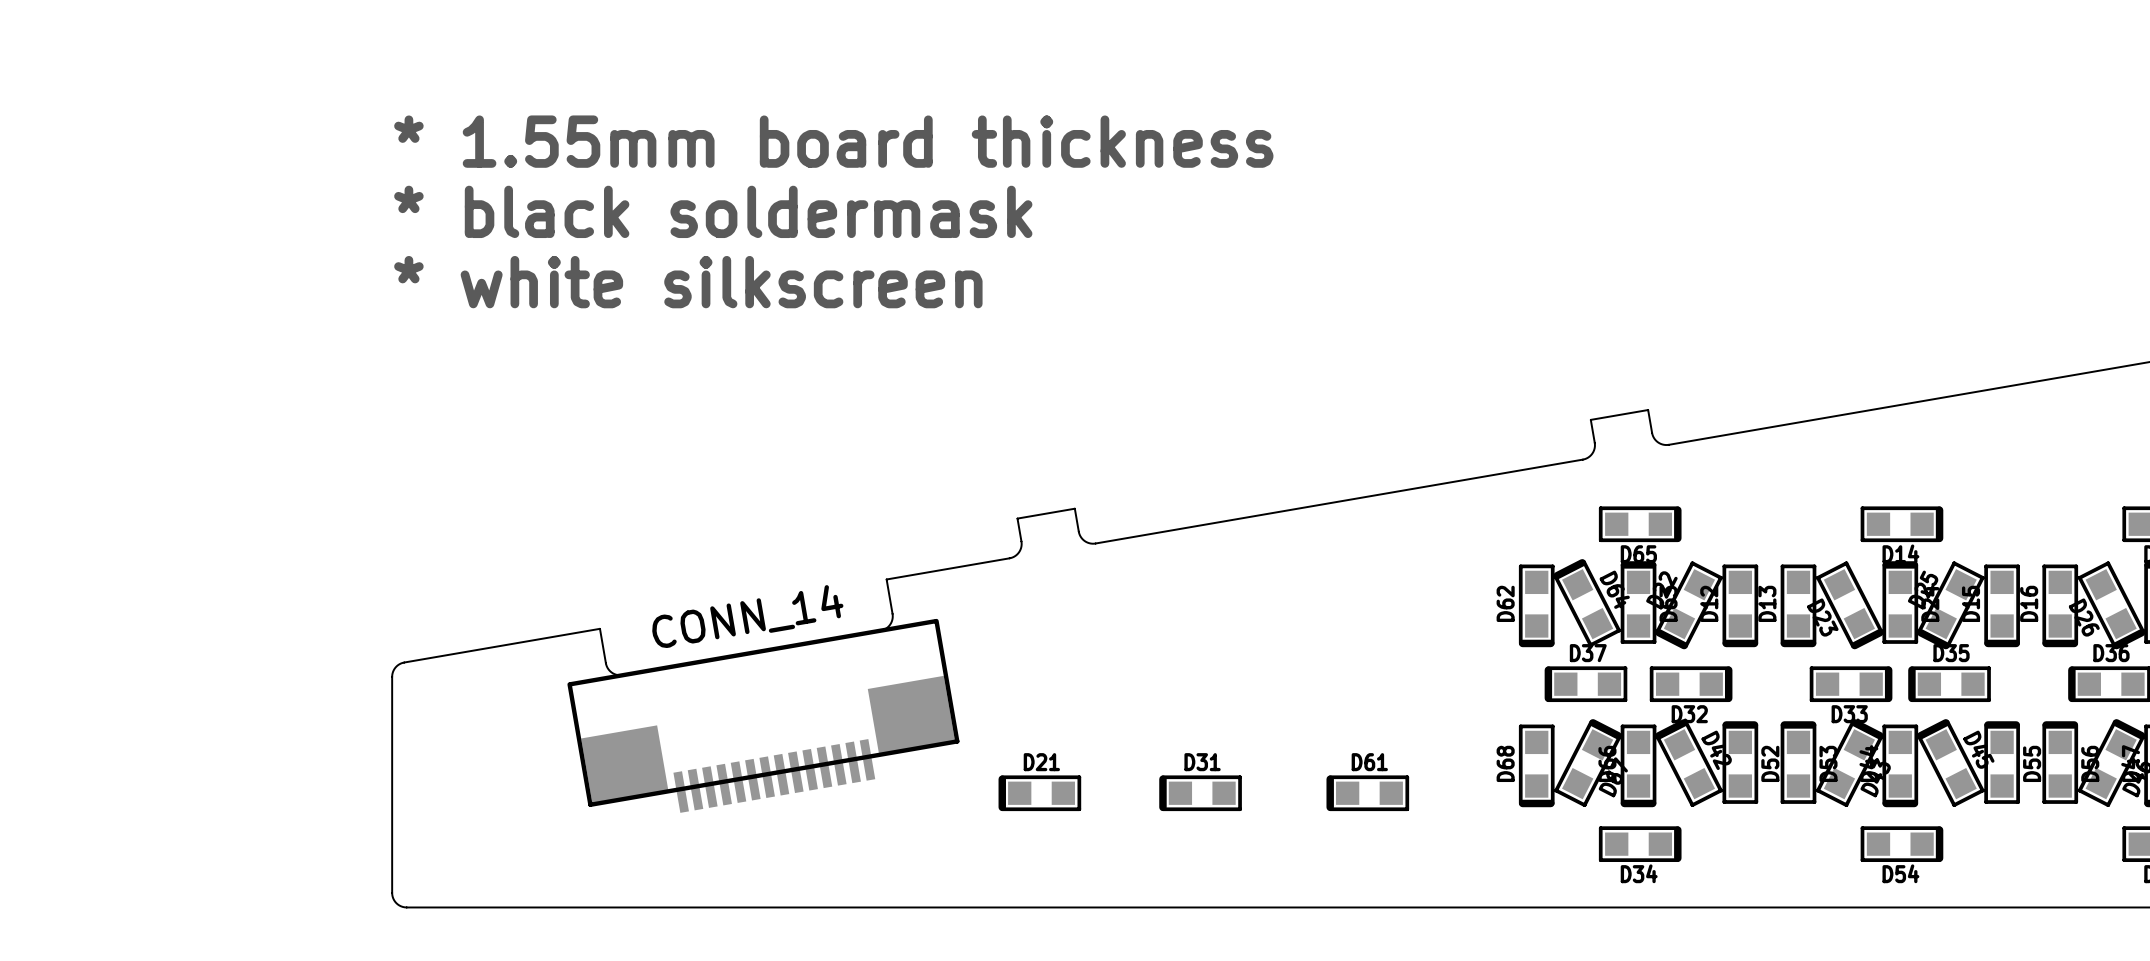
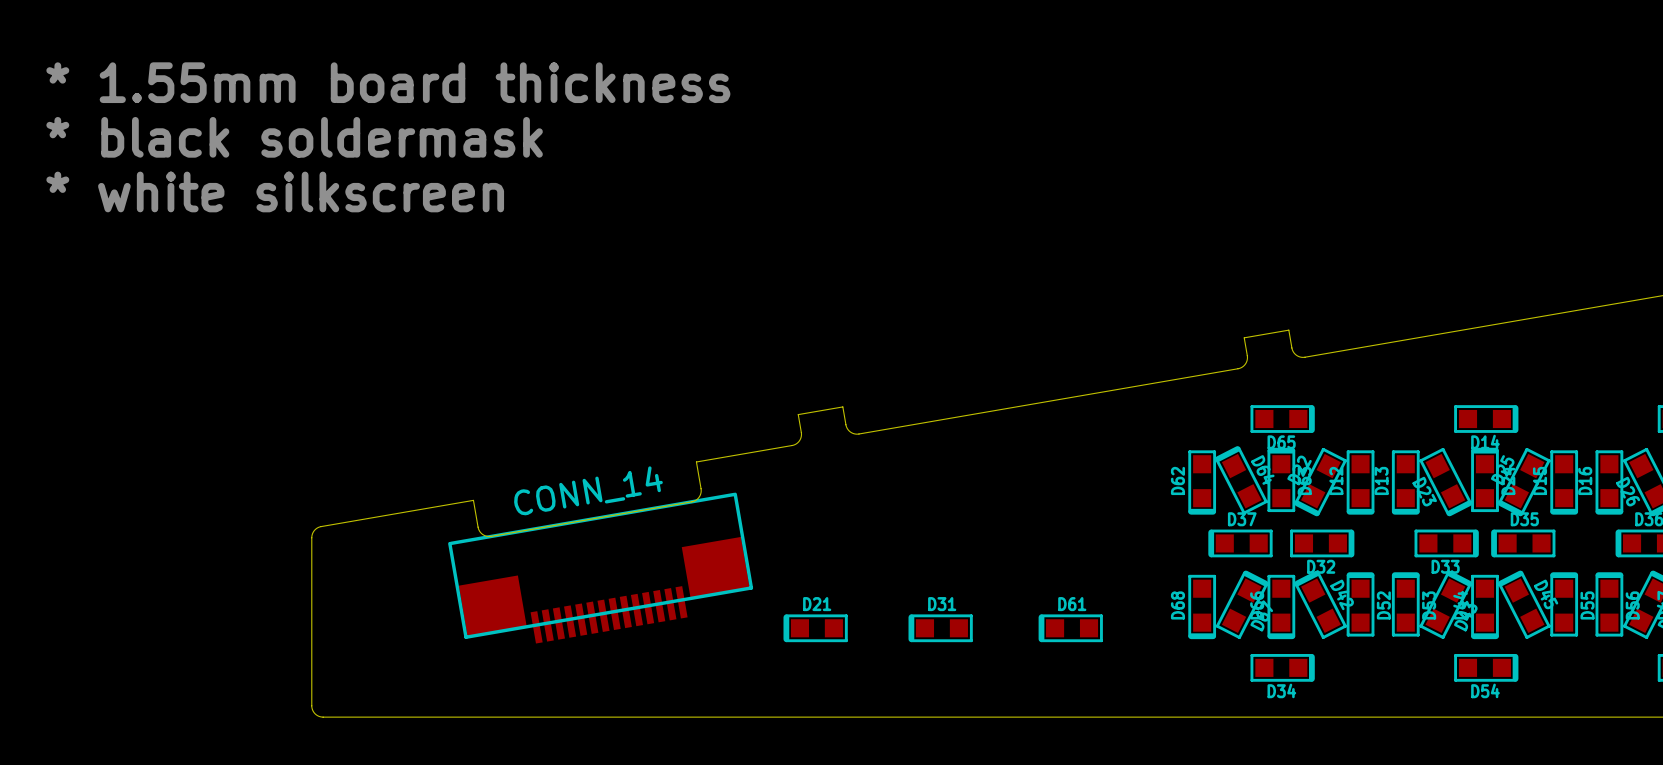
text position: * 1.55mm board thickness (833, 141) -> * 1.55mm board thickness (388, 82)
text position: * black soldermask (713, 211) -> * black soldermask (294, 137)
text position: * white silkscreen (688, 282) -> * white silkscreen (275, 191)

